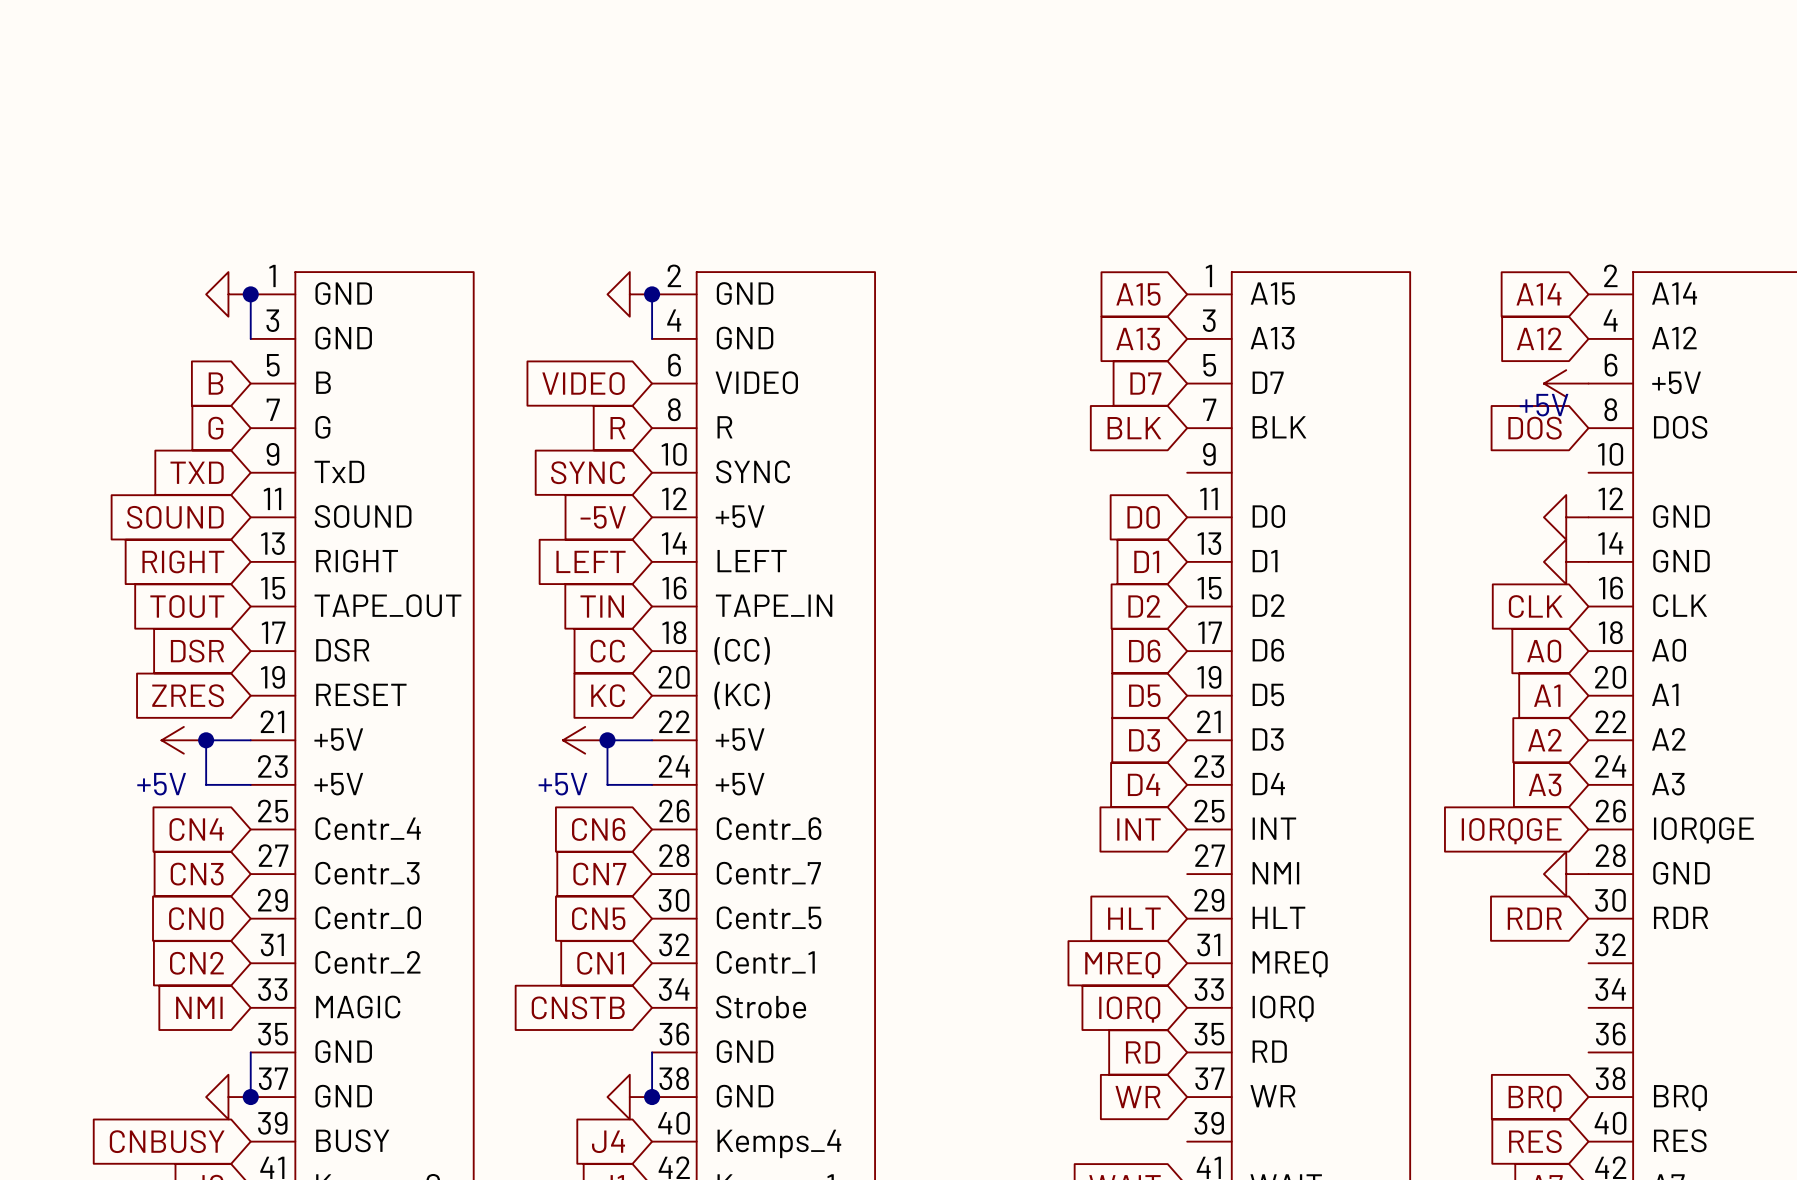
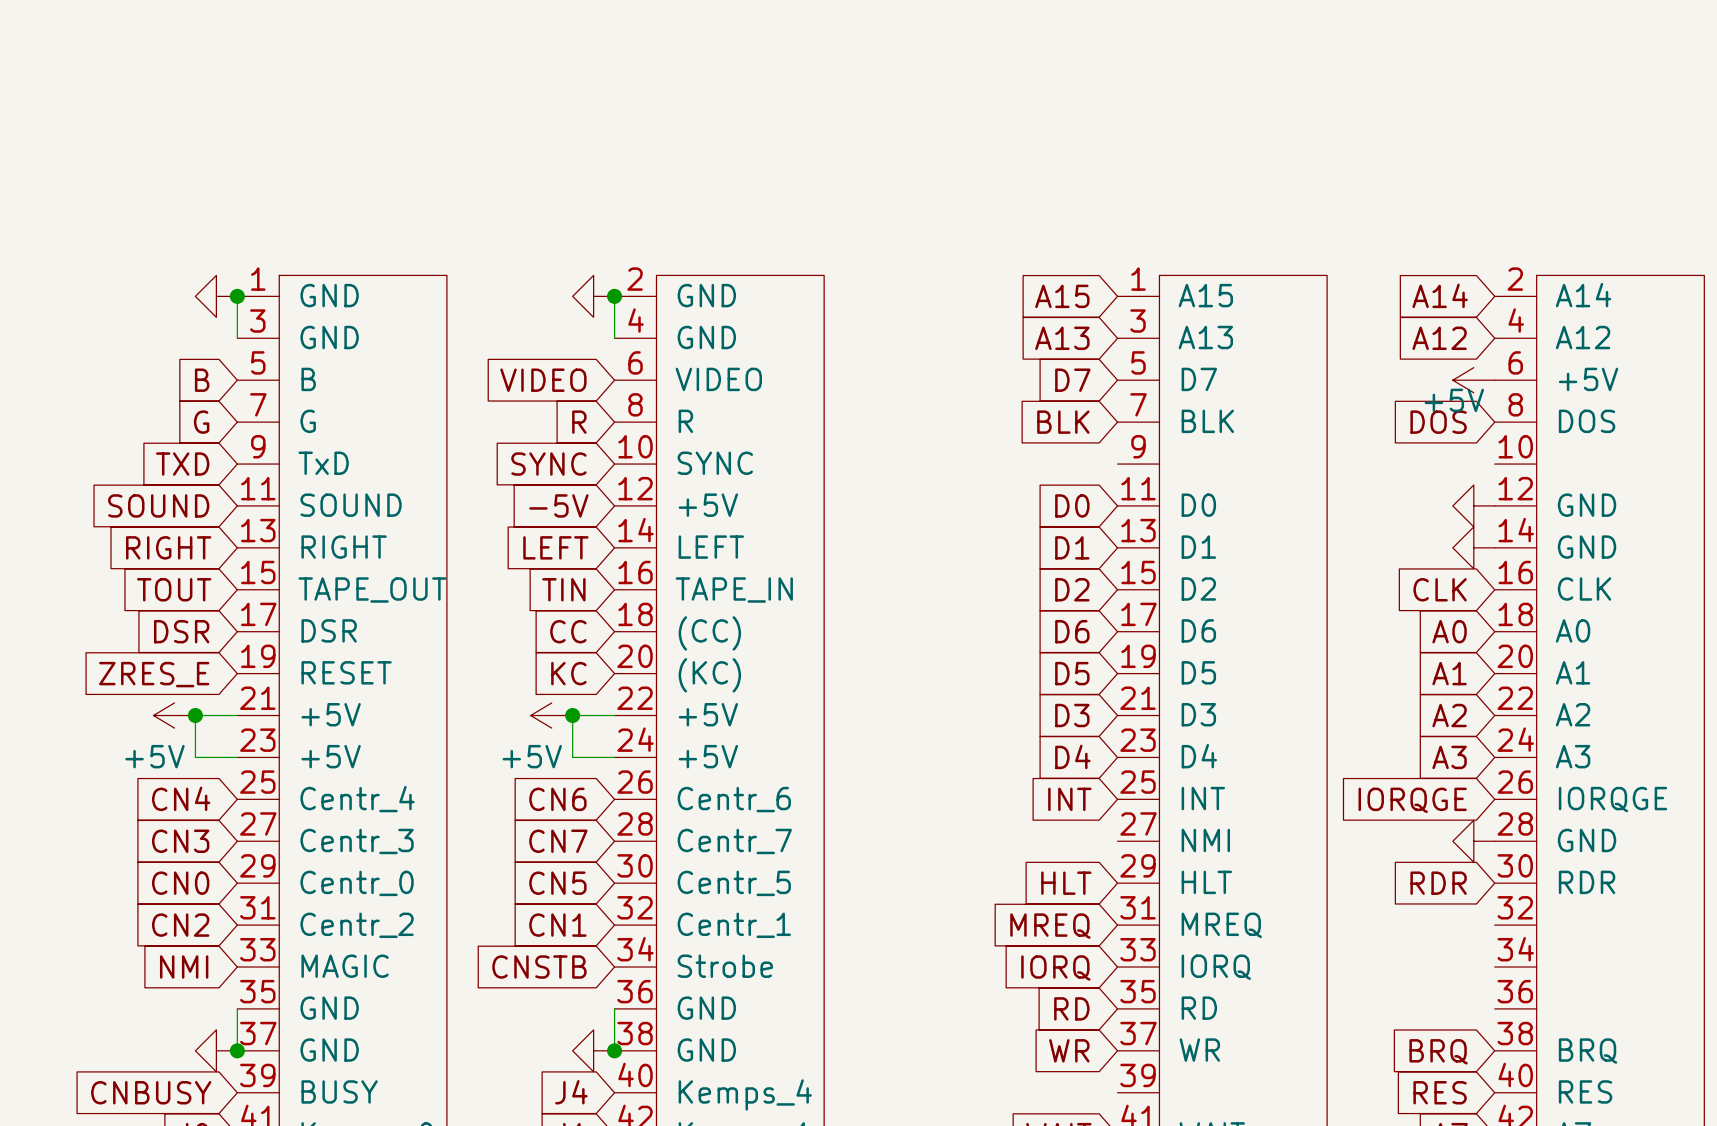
global label: ZRES (188, 695) -> ZRES_E (154, 674)

